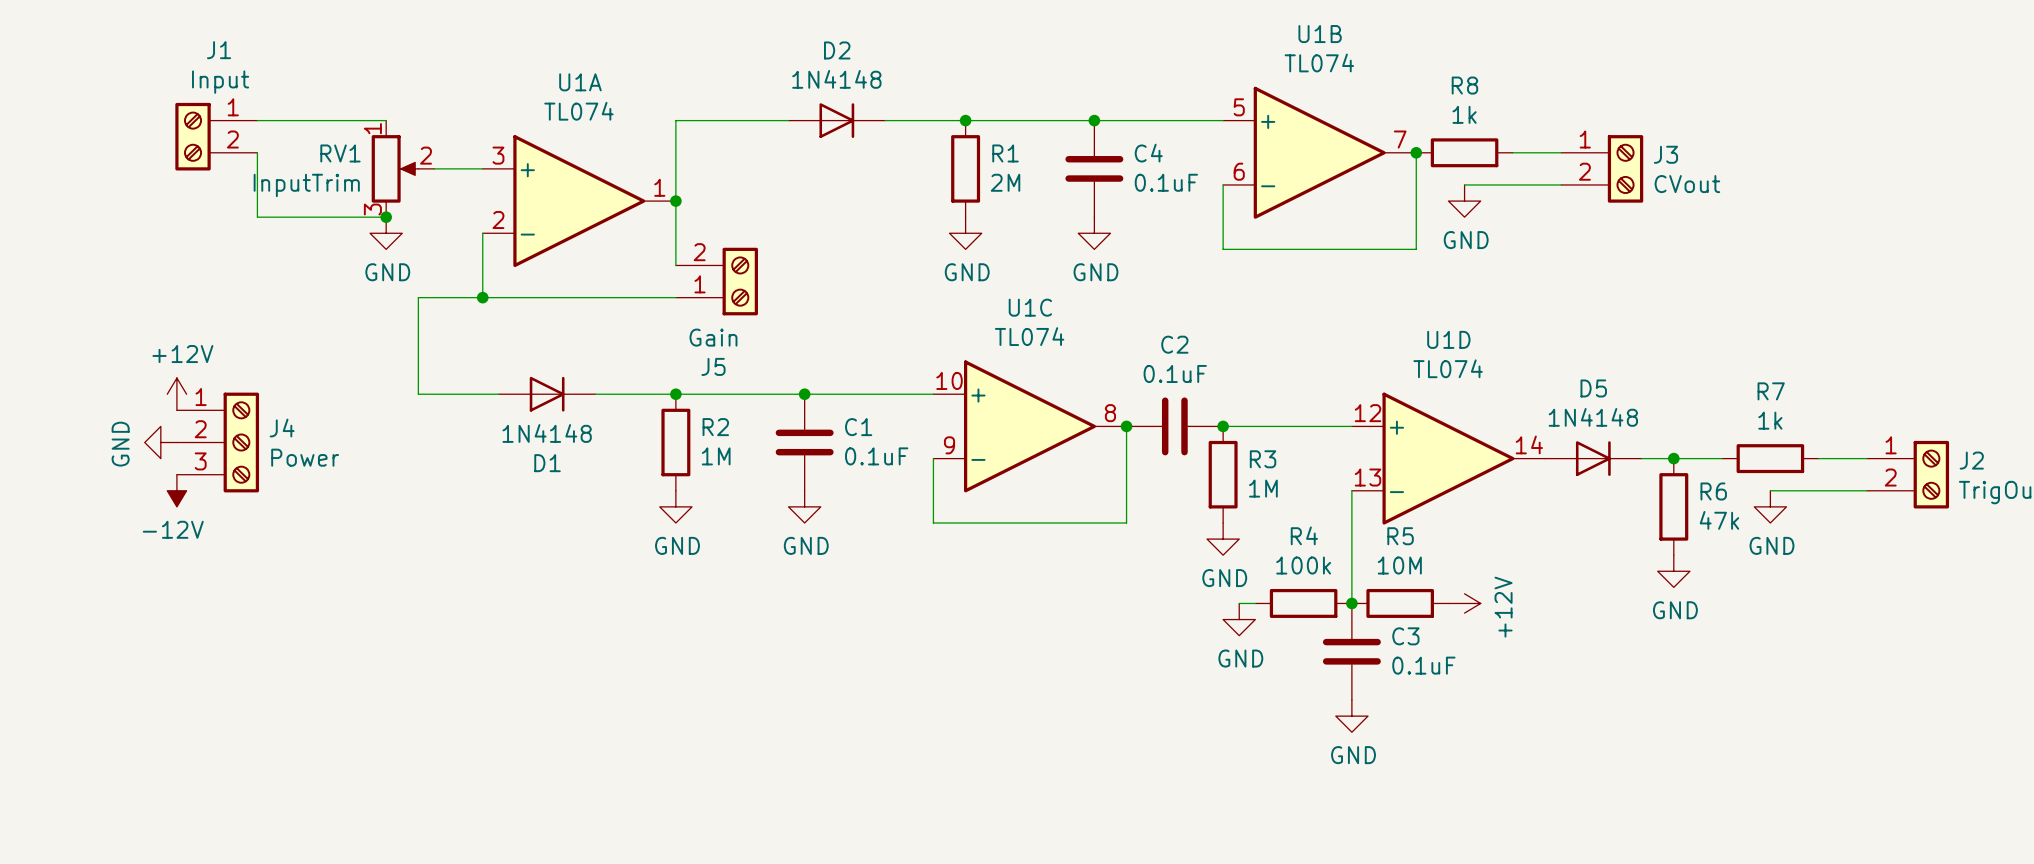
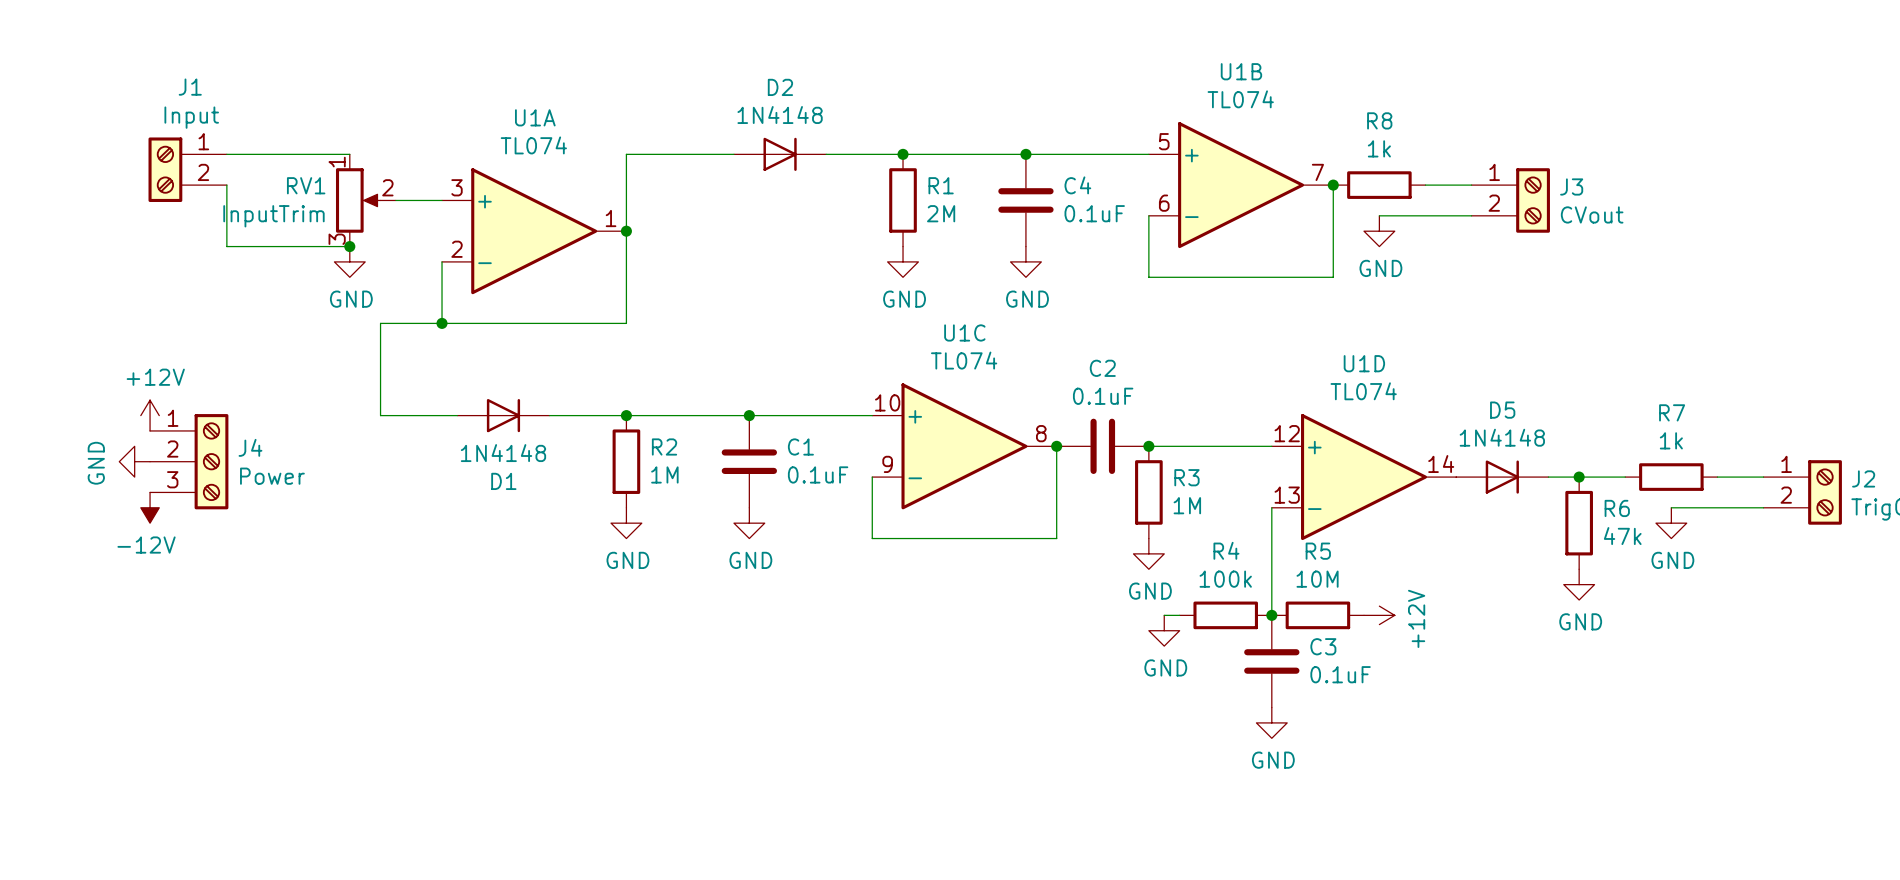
wire: none -> (626, 292) (626, 323)
J5: Gain (716, 281) -> none

